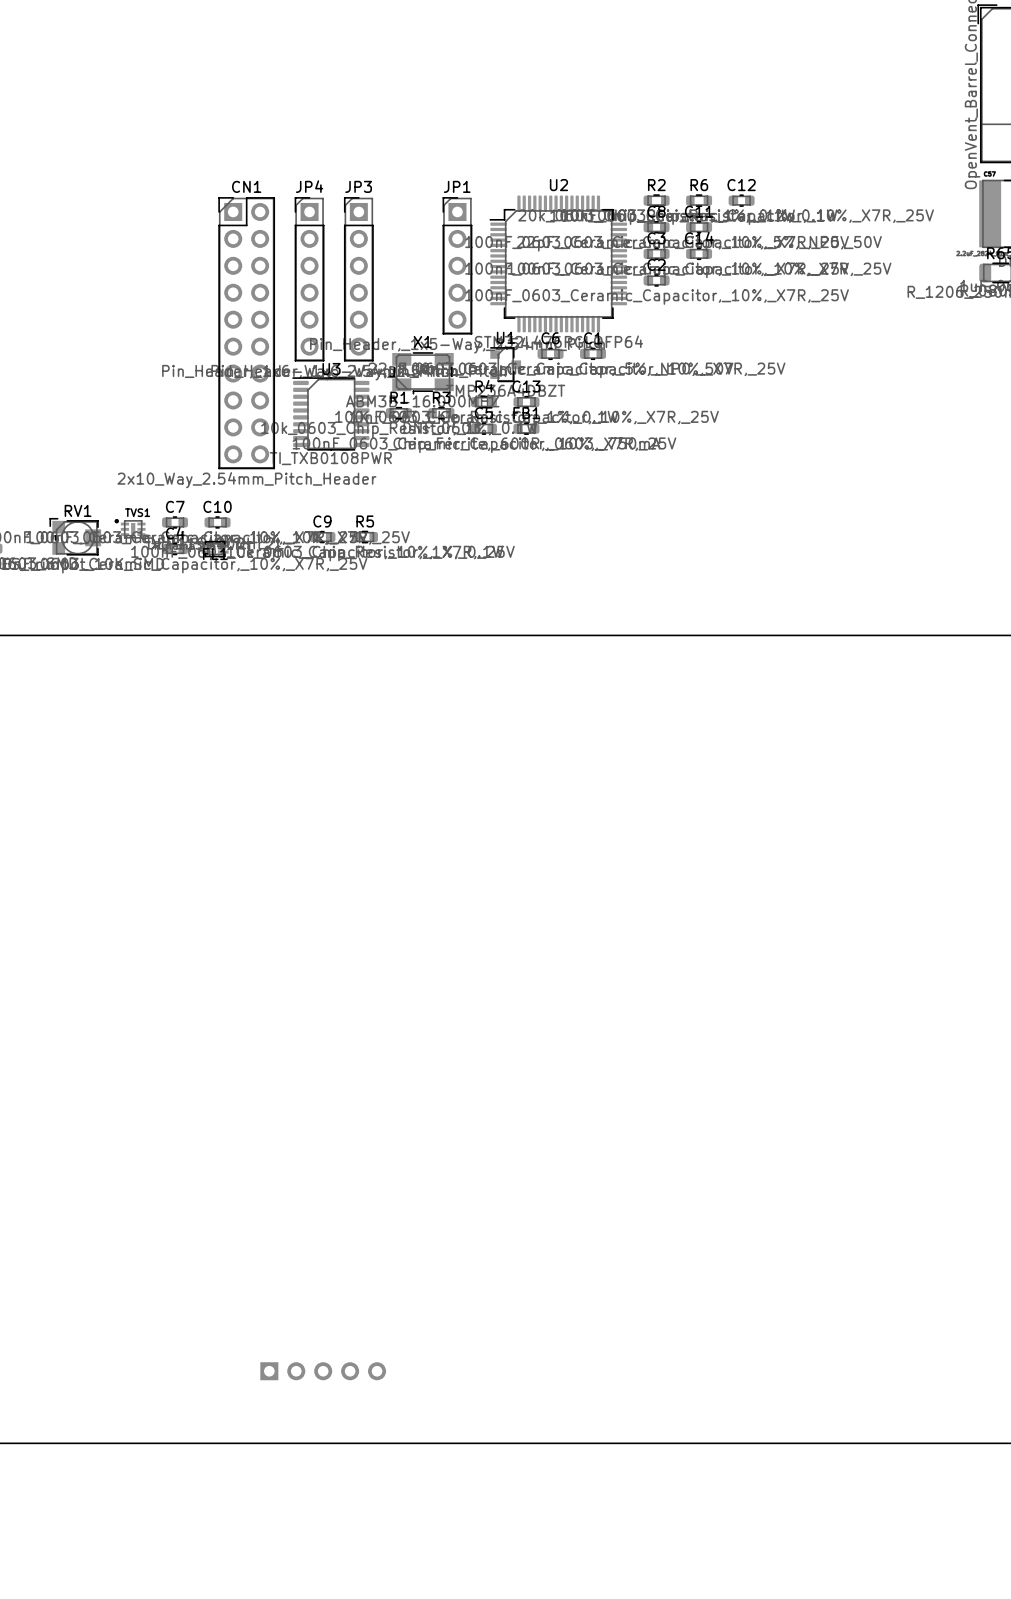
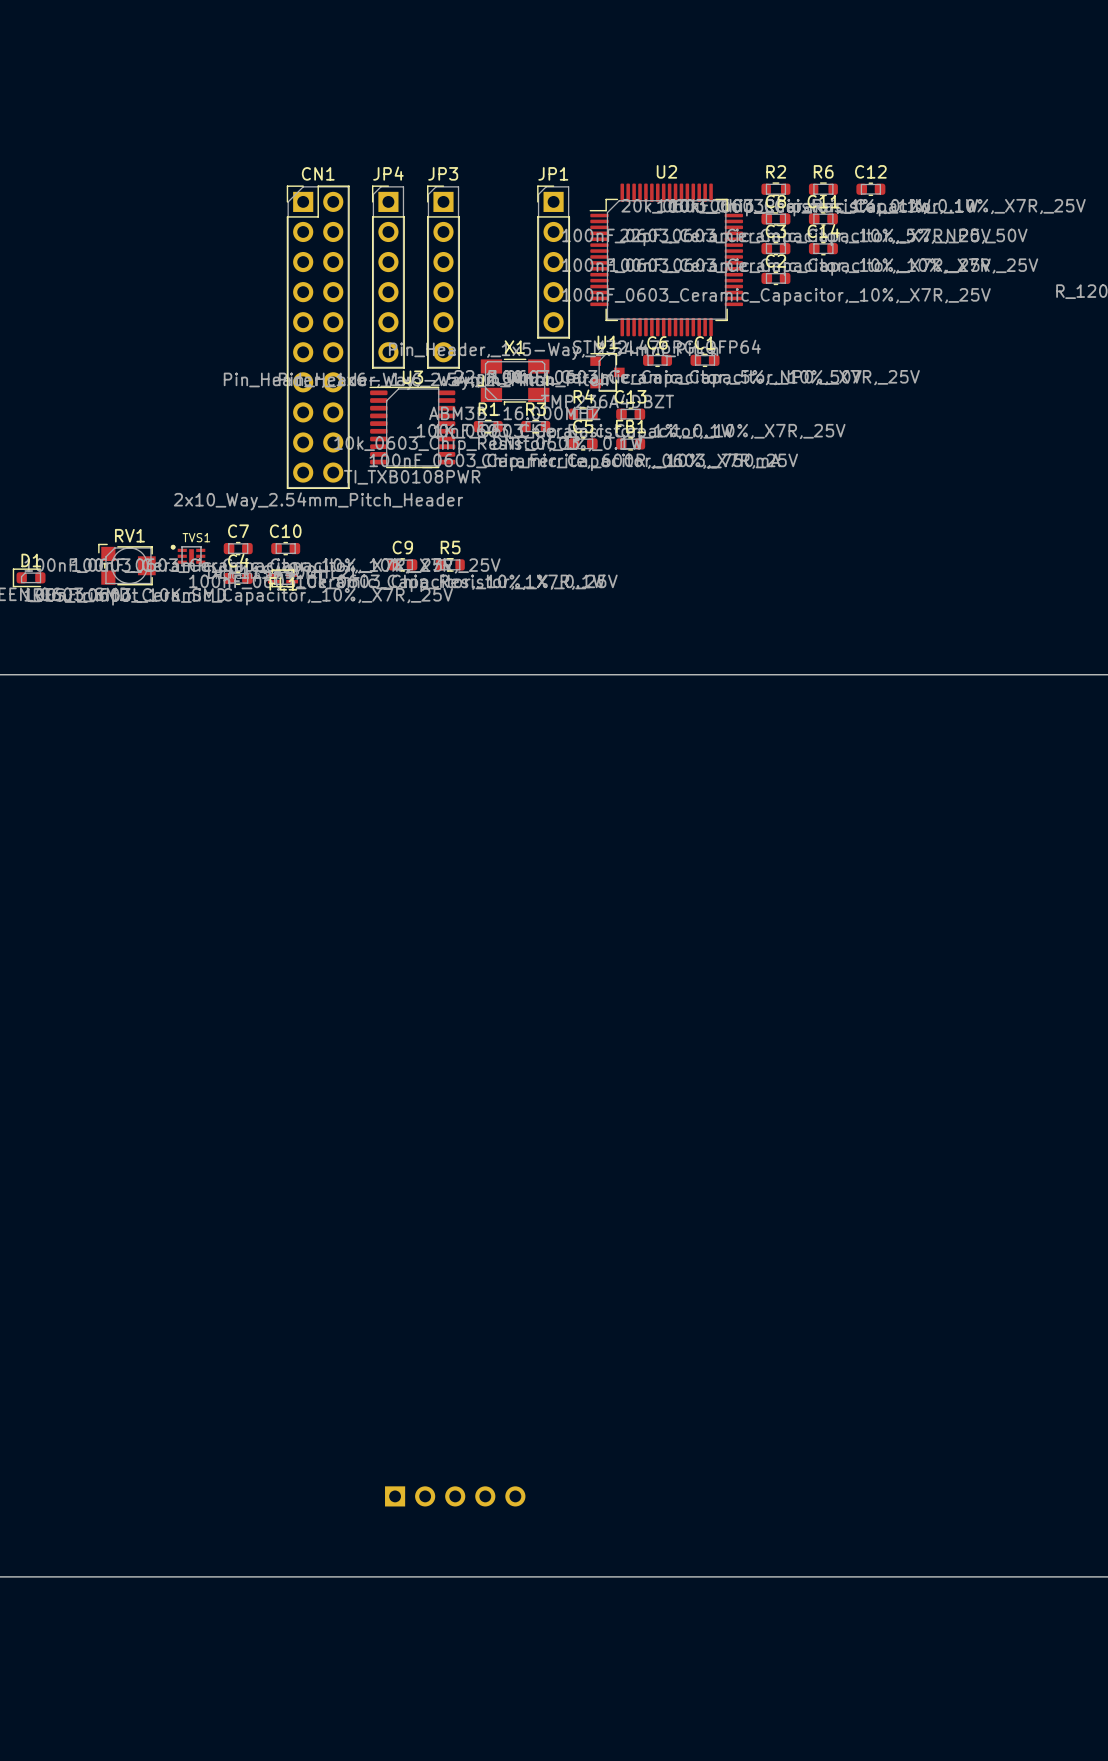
part position: (323, 1371) -> (455, 1496)

